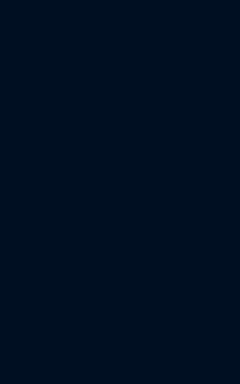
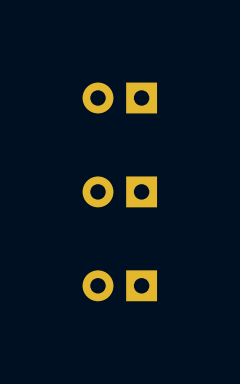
part: none -> (119, 98)
part: none -> (119, 191)
part: none -> (119, 285)

